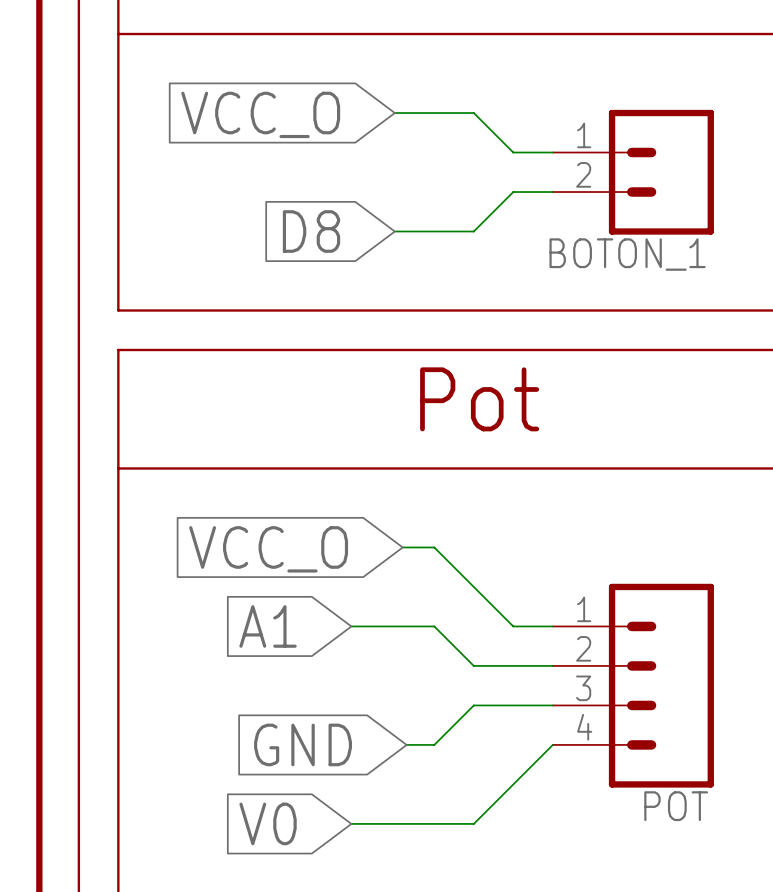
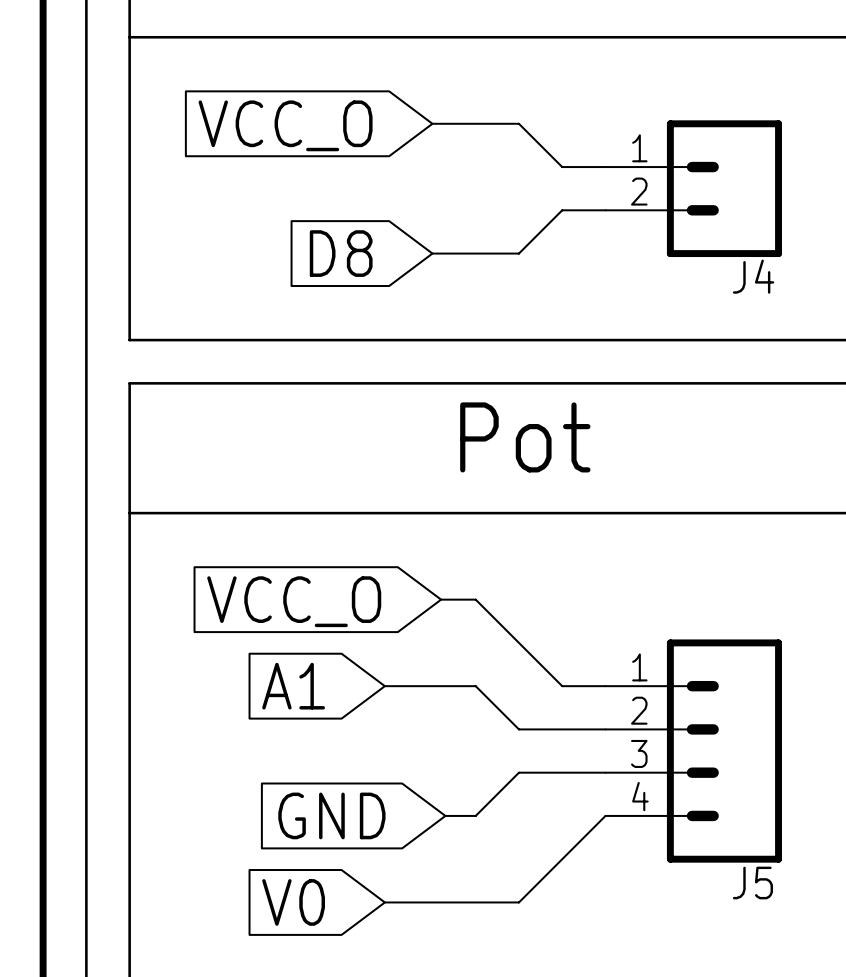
BOTON_1 name: BOTON_1 (627, 254) -> J4 (753, 276)
POT name: POT (676, 806) -> J5 (752, 882)

